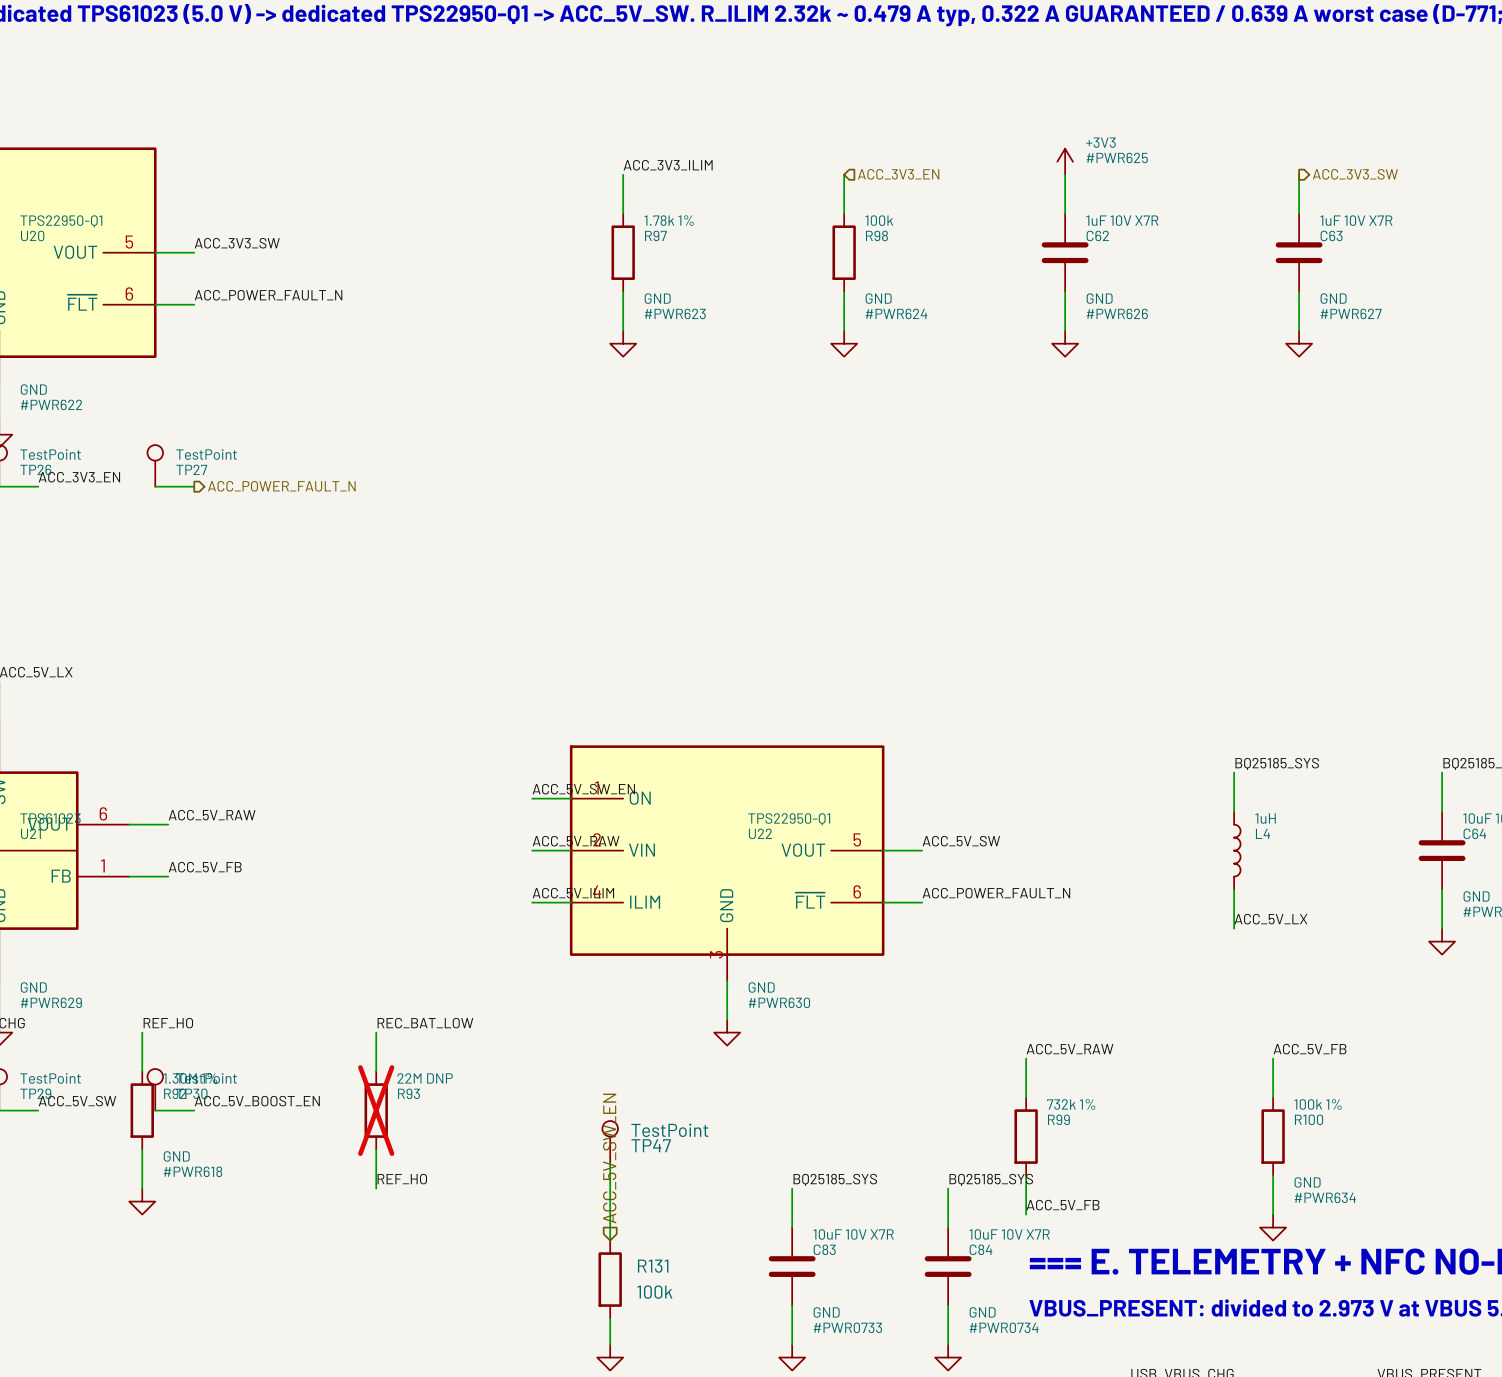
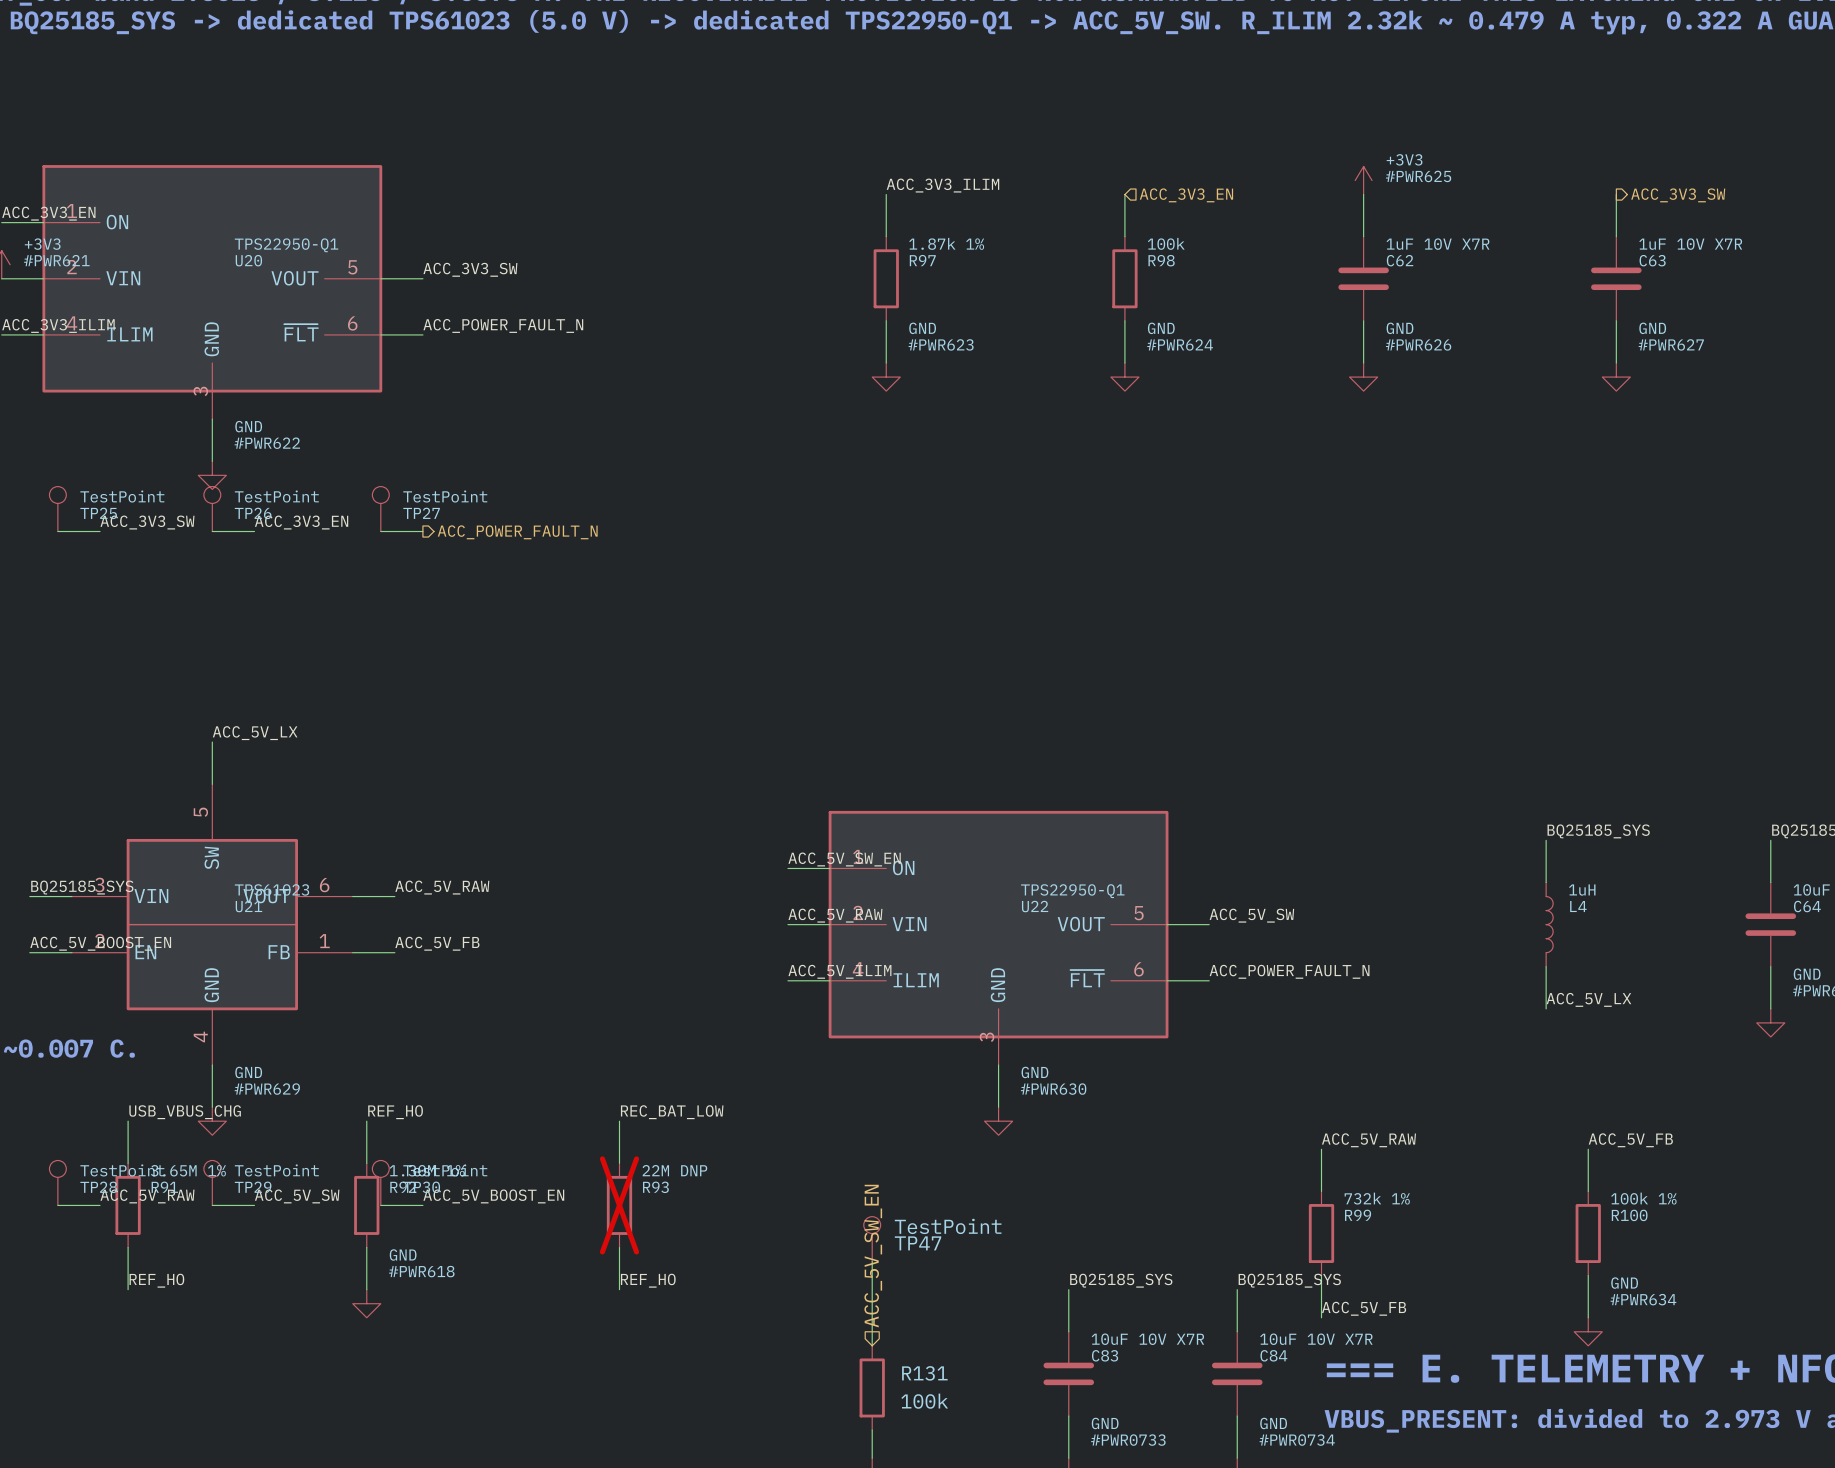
R97 value: 1.78k 1% (669, 220) -> 1.87k 1% (946, 243)

